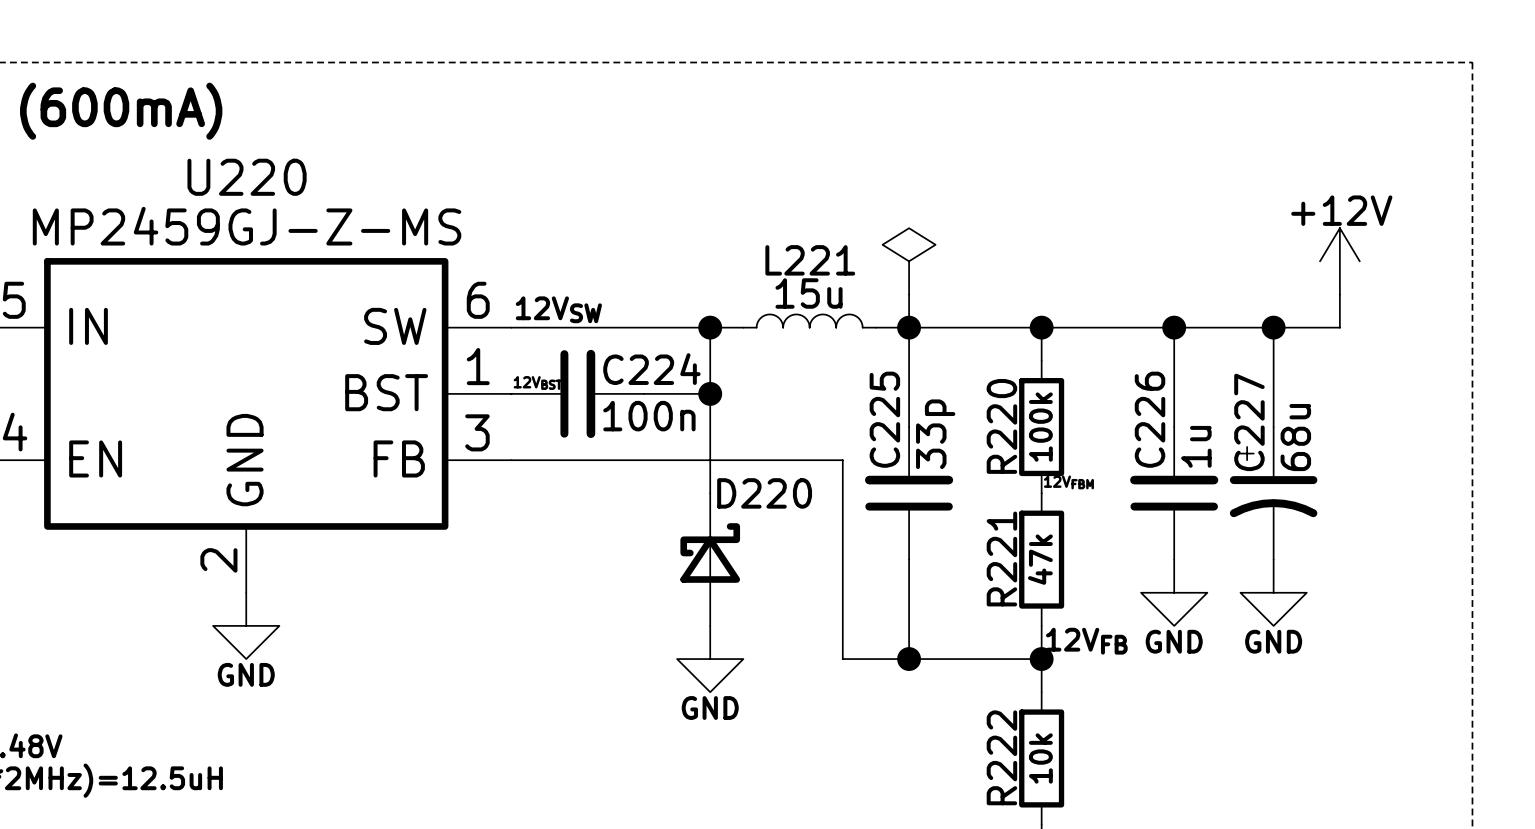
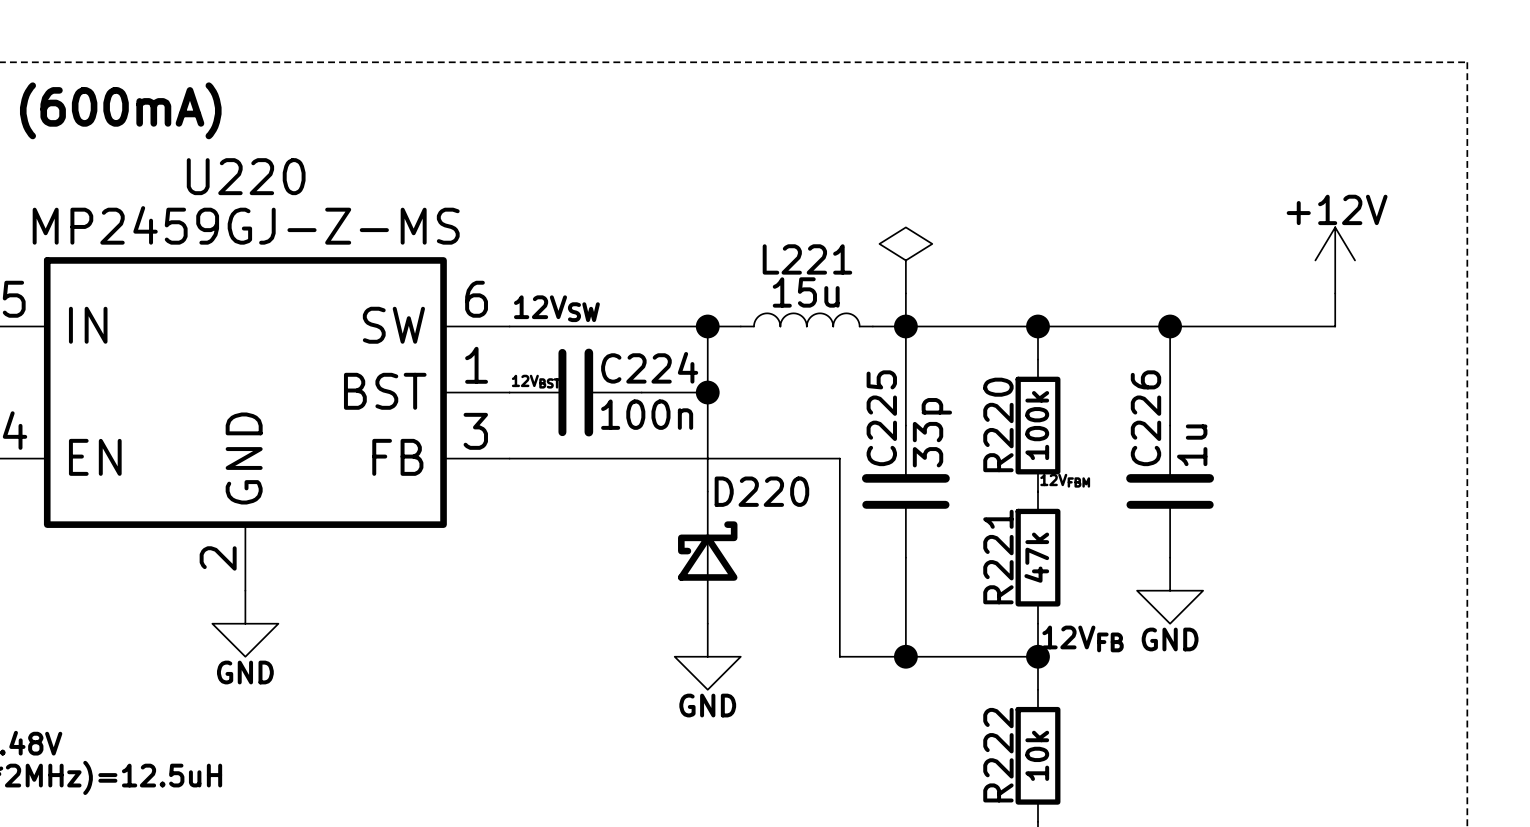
wire: (1273, 327) (1273, 427) -> none
junction: (1273, 327) -> none
C227: 68u (1273, 493) -> none
power symbol: GND (1273, 592) -> none

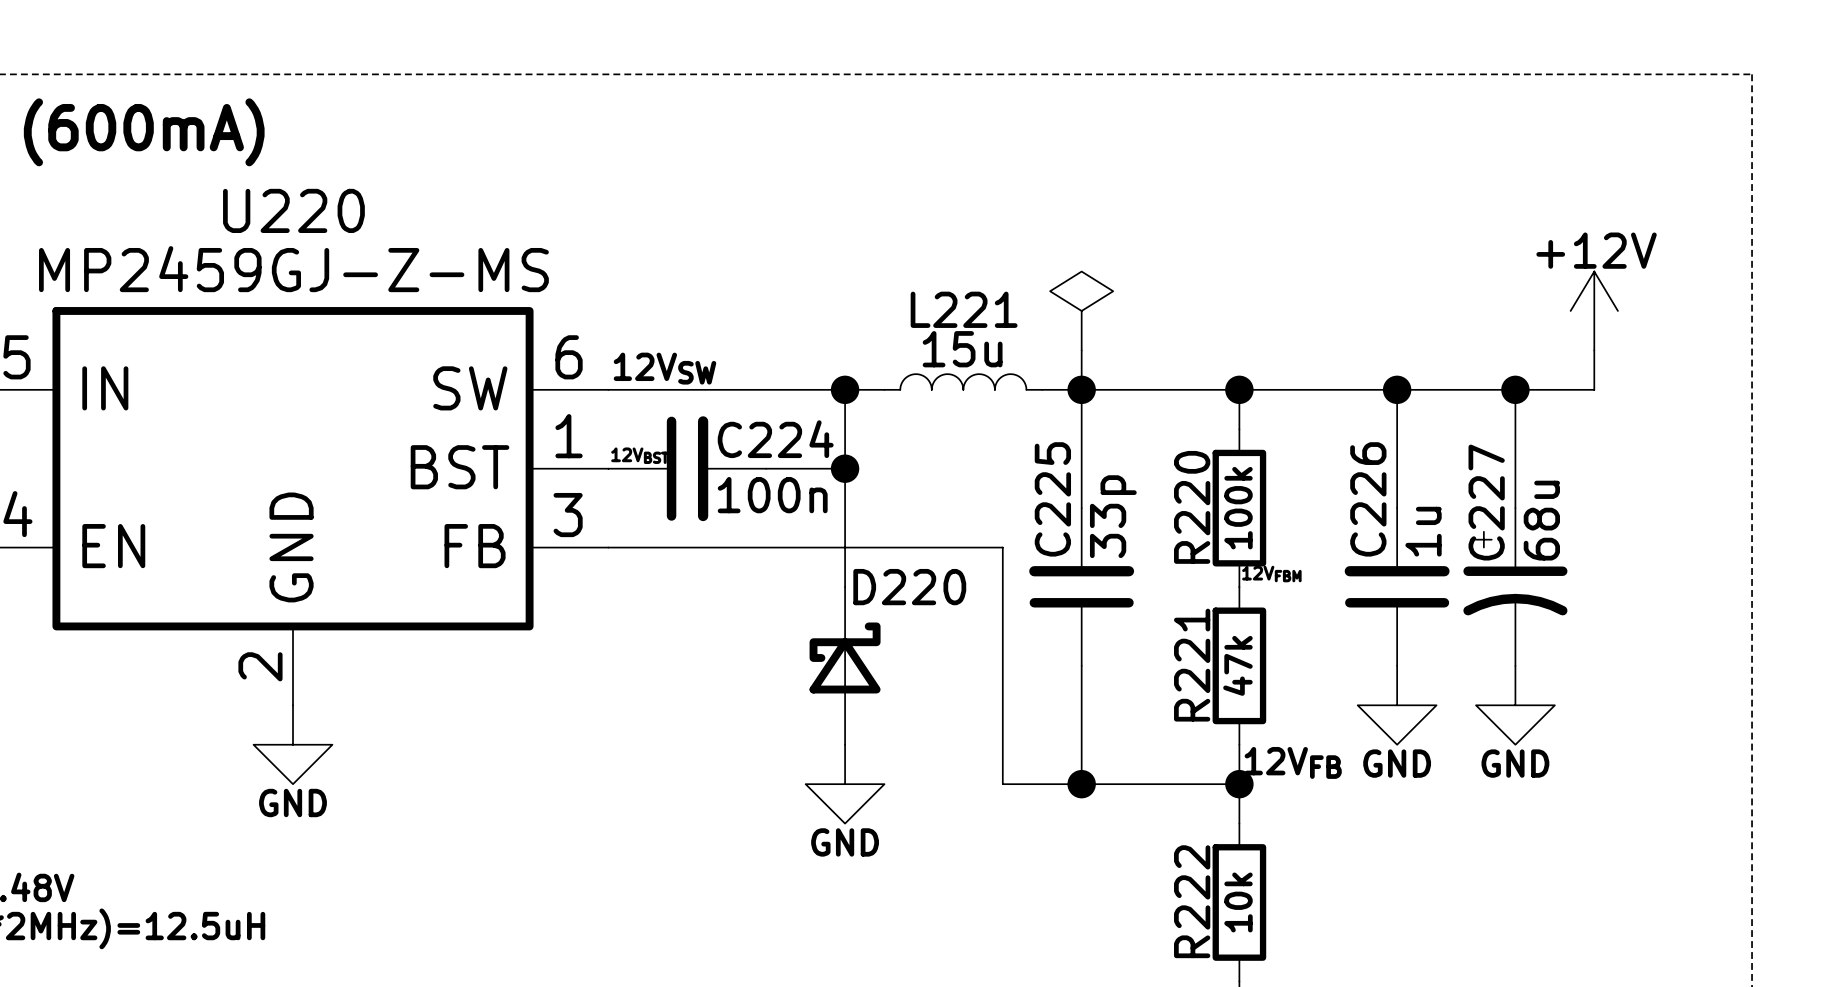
wire: none -> (1515, 389) (1515, 508)
junction: none -> (1515, 389)
C227: none -> 68u (1515, 587)
power symbol: none -> GND (1515, 705)

